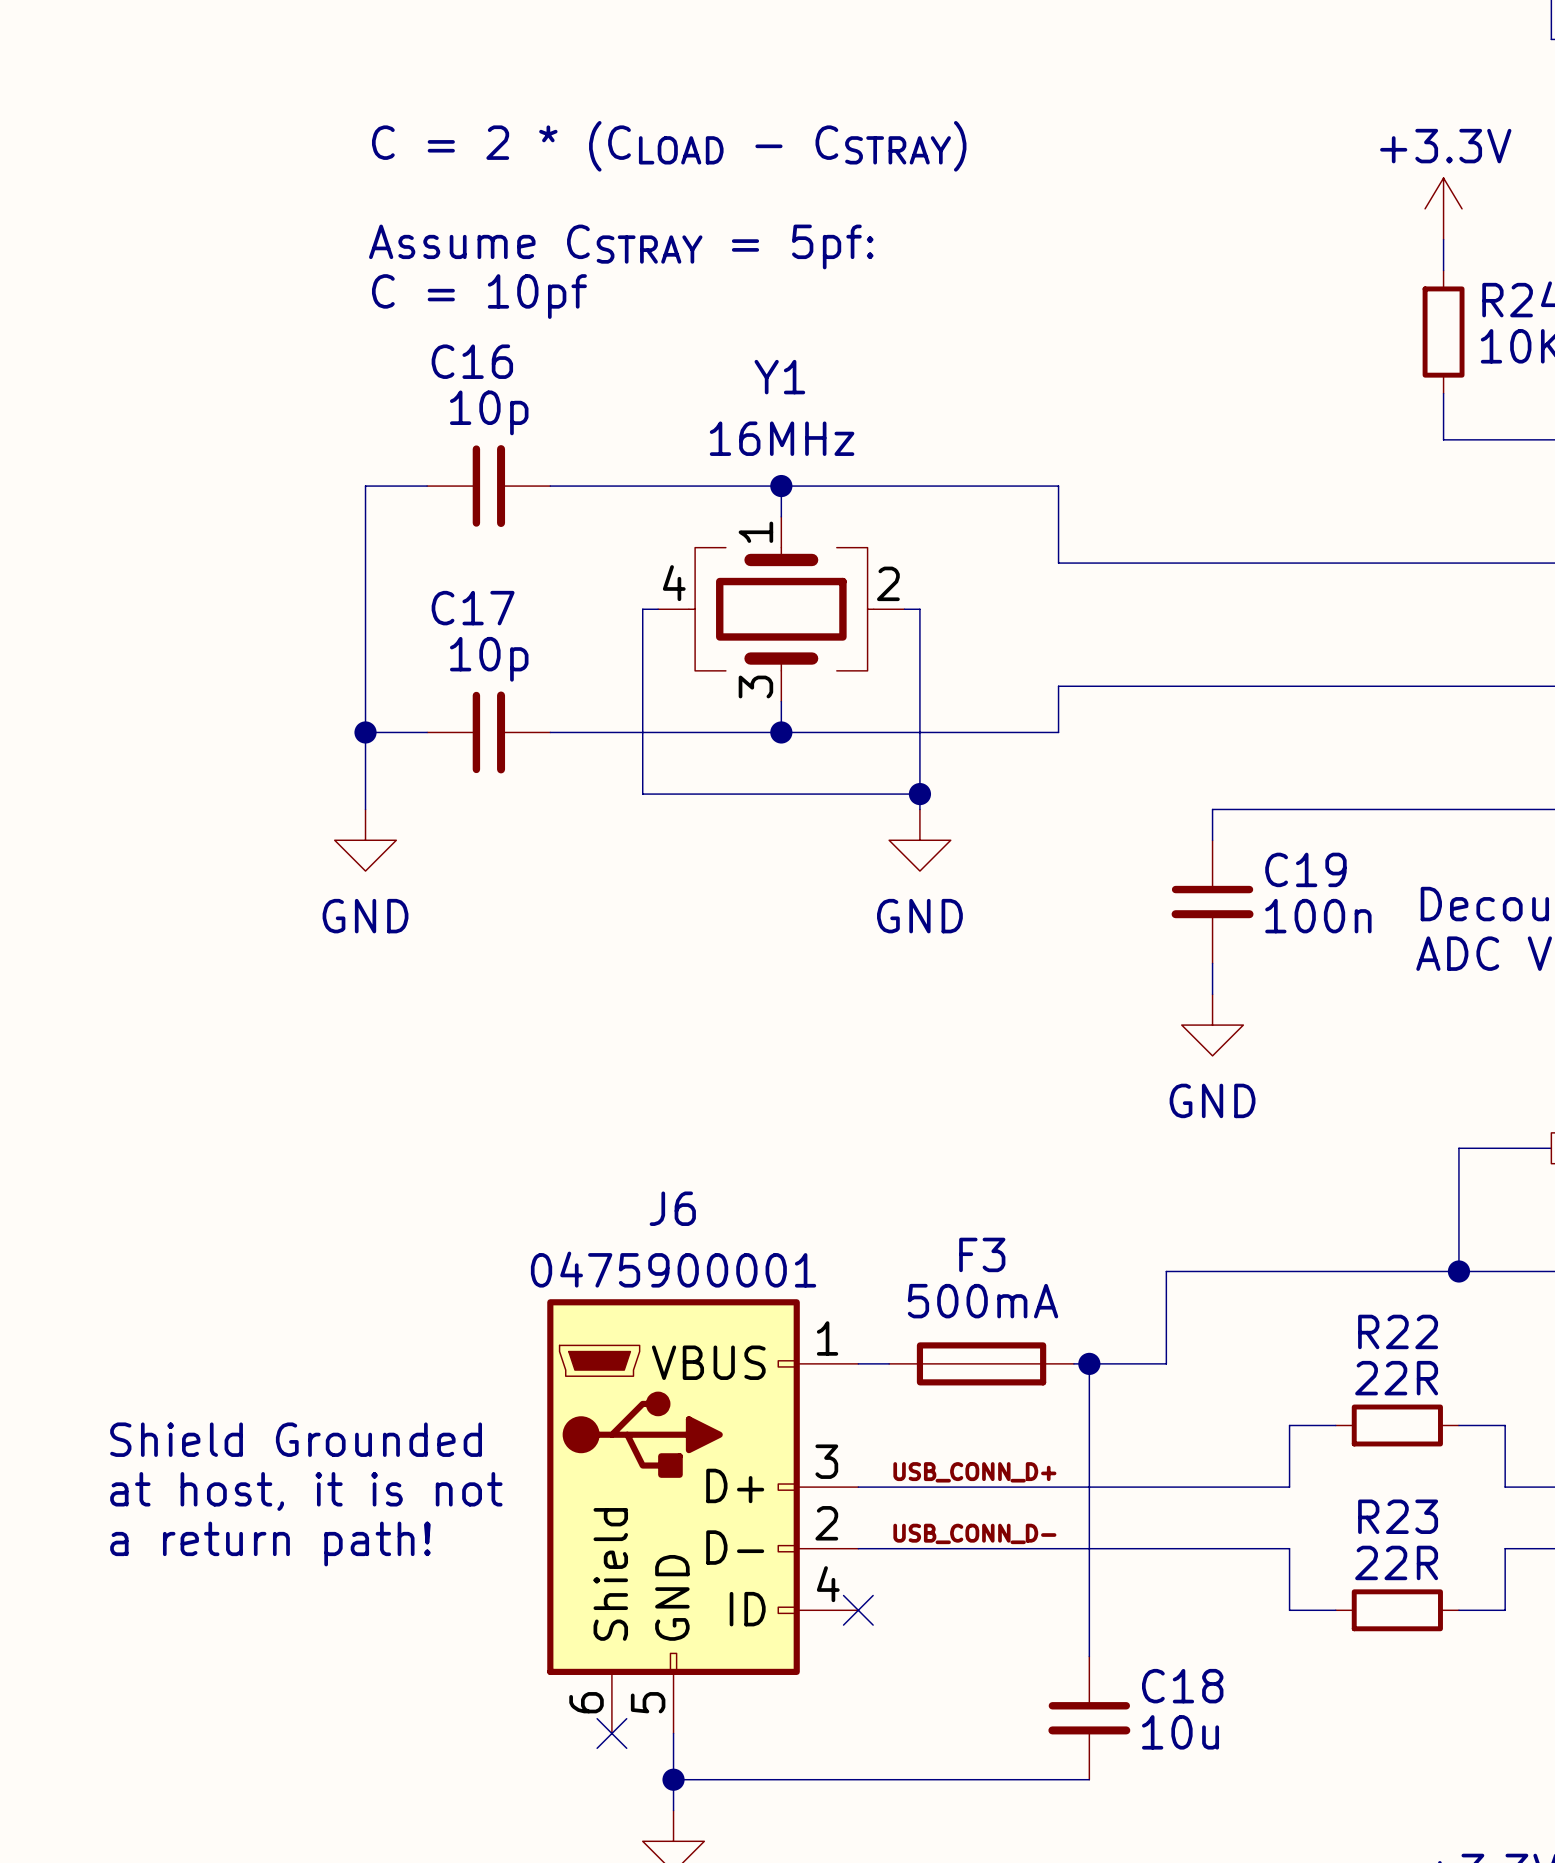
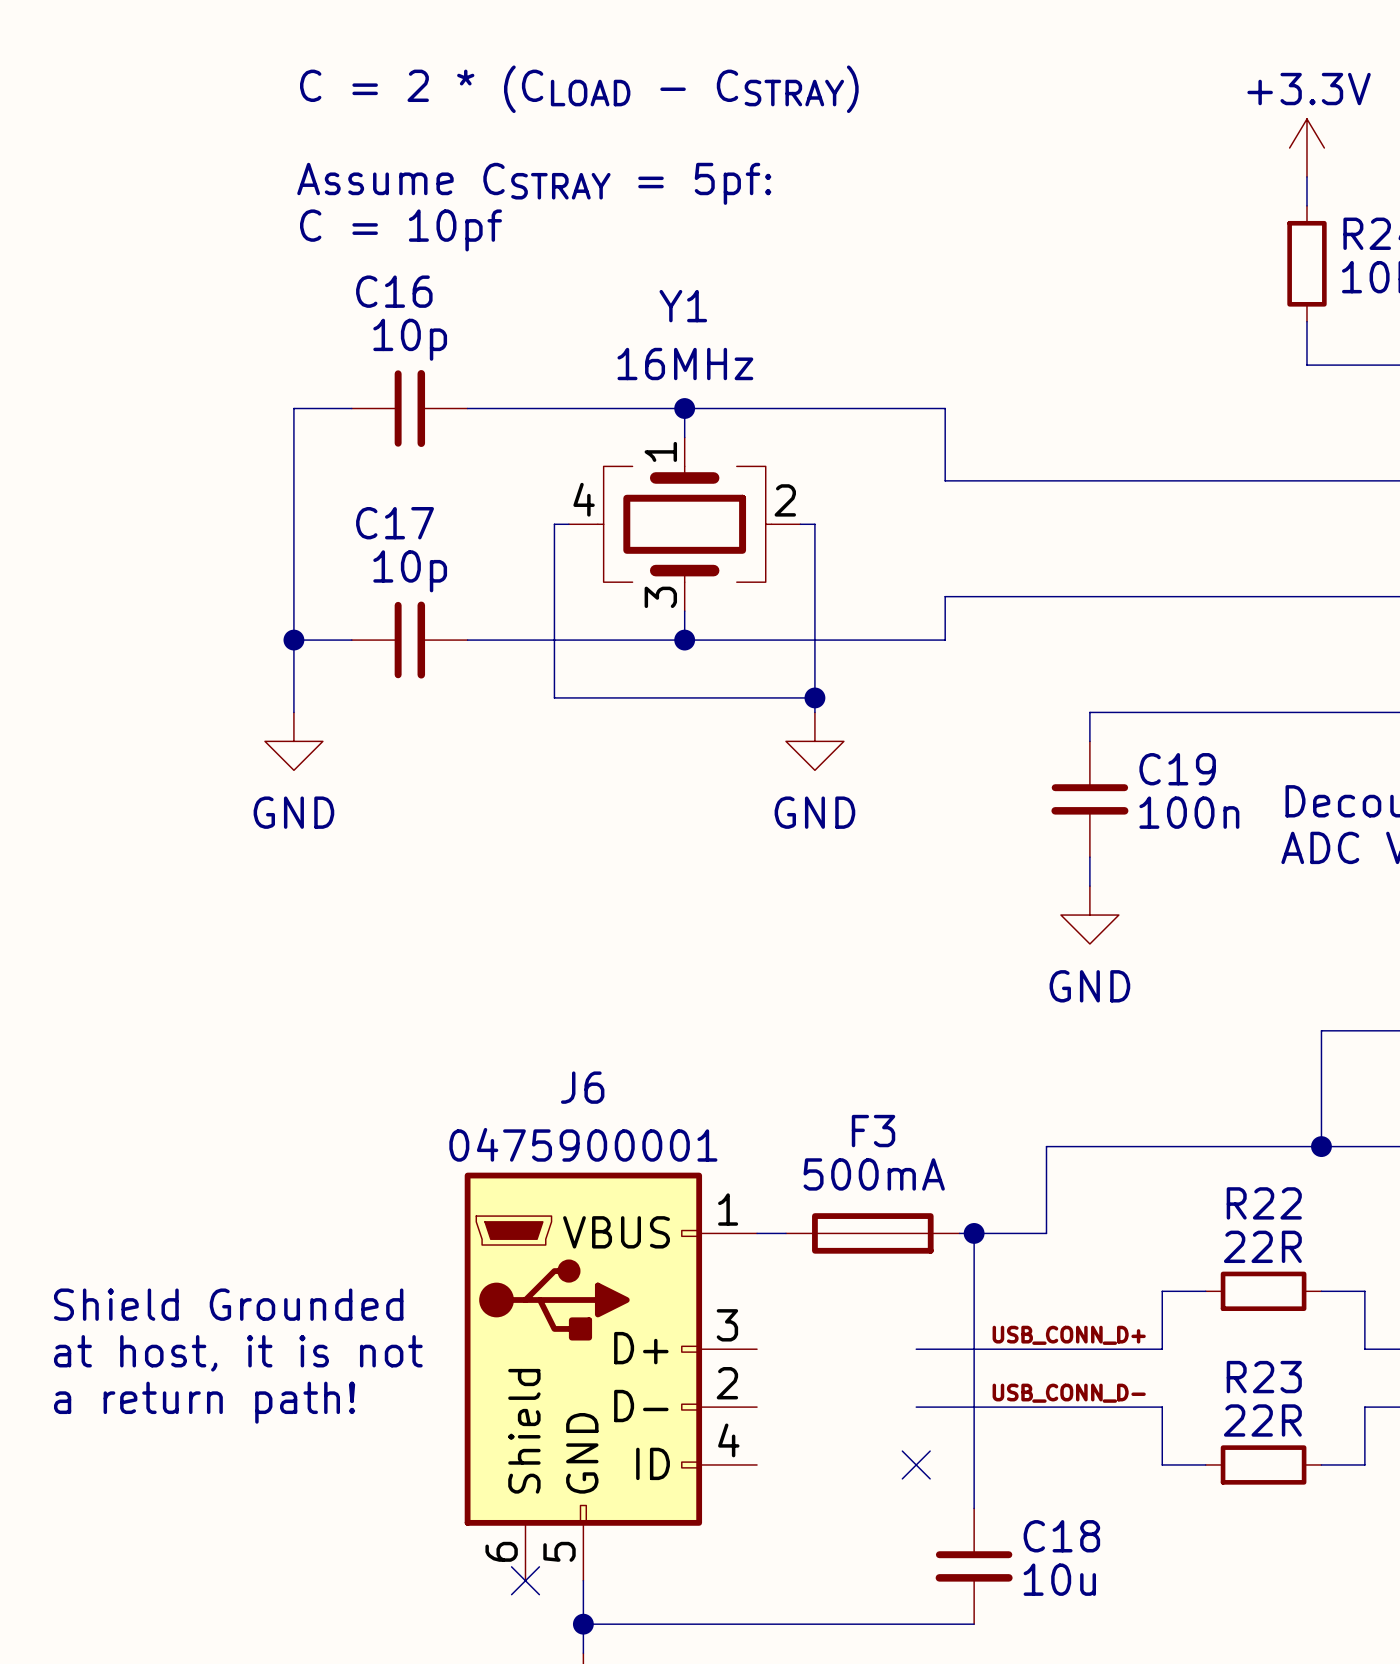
label position: USB_CONN_D+ (974, 1472) -> USB_CONN_D+ (1069, 1335)
wire: (858, 1487) (1027, 1487) -> none
label position: USB_CONN_D- (974, 1533) -> USB_CONN_D- (1069, 1393)
wire: (858, 1548) (1027, 1548) -> none
no-connect mark: (858, 1610) -> none
no-connect mark: none -> (916, 1464)

